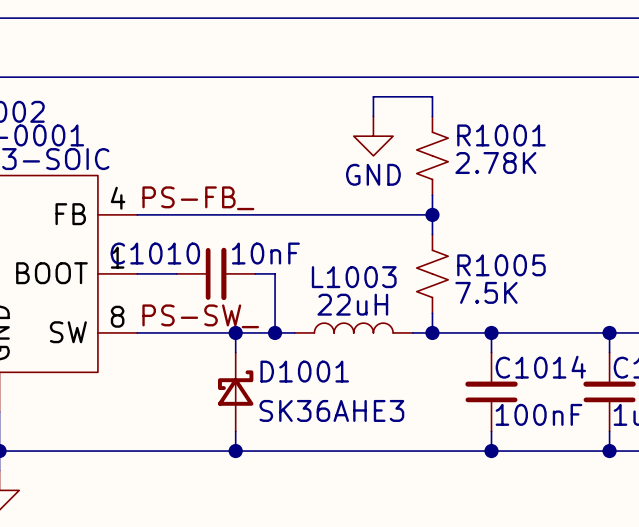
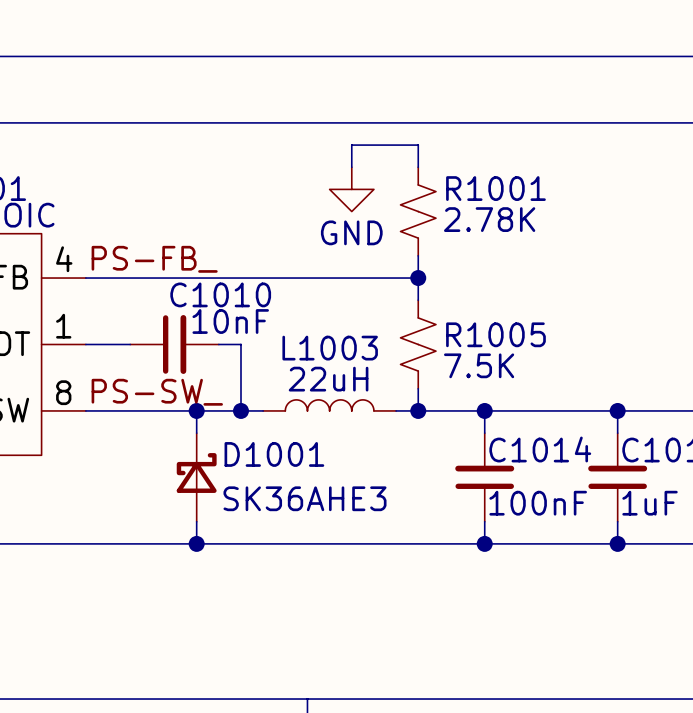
C1010 name position: C1010 (155, 253) -> C1010 (220, 294)

